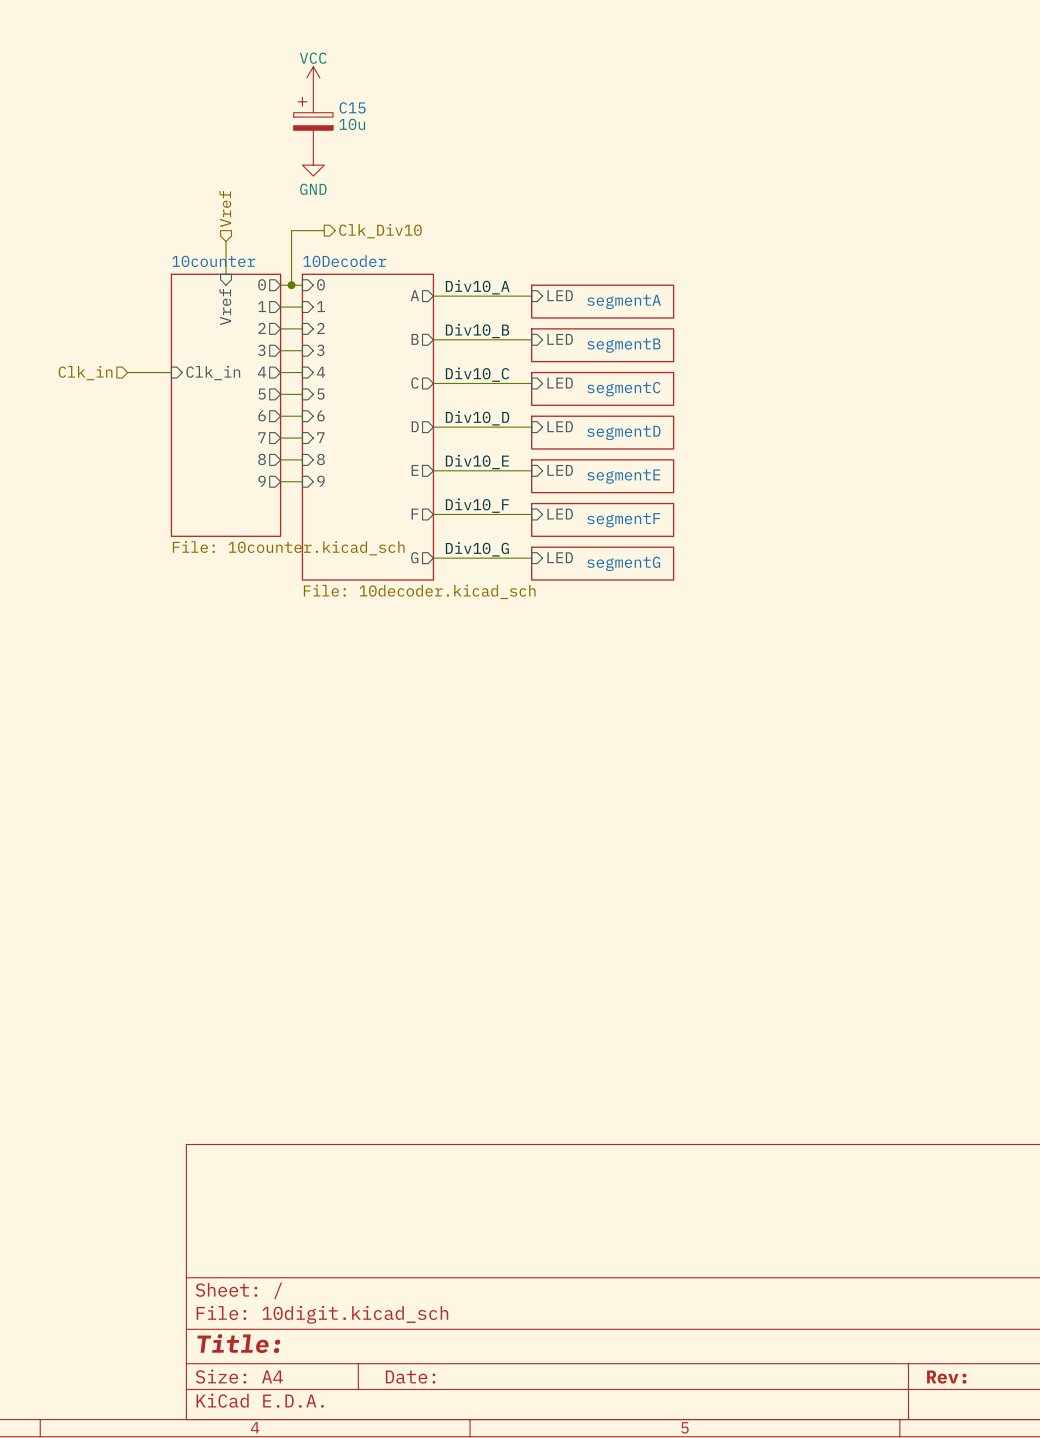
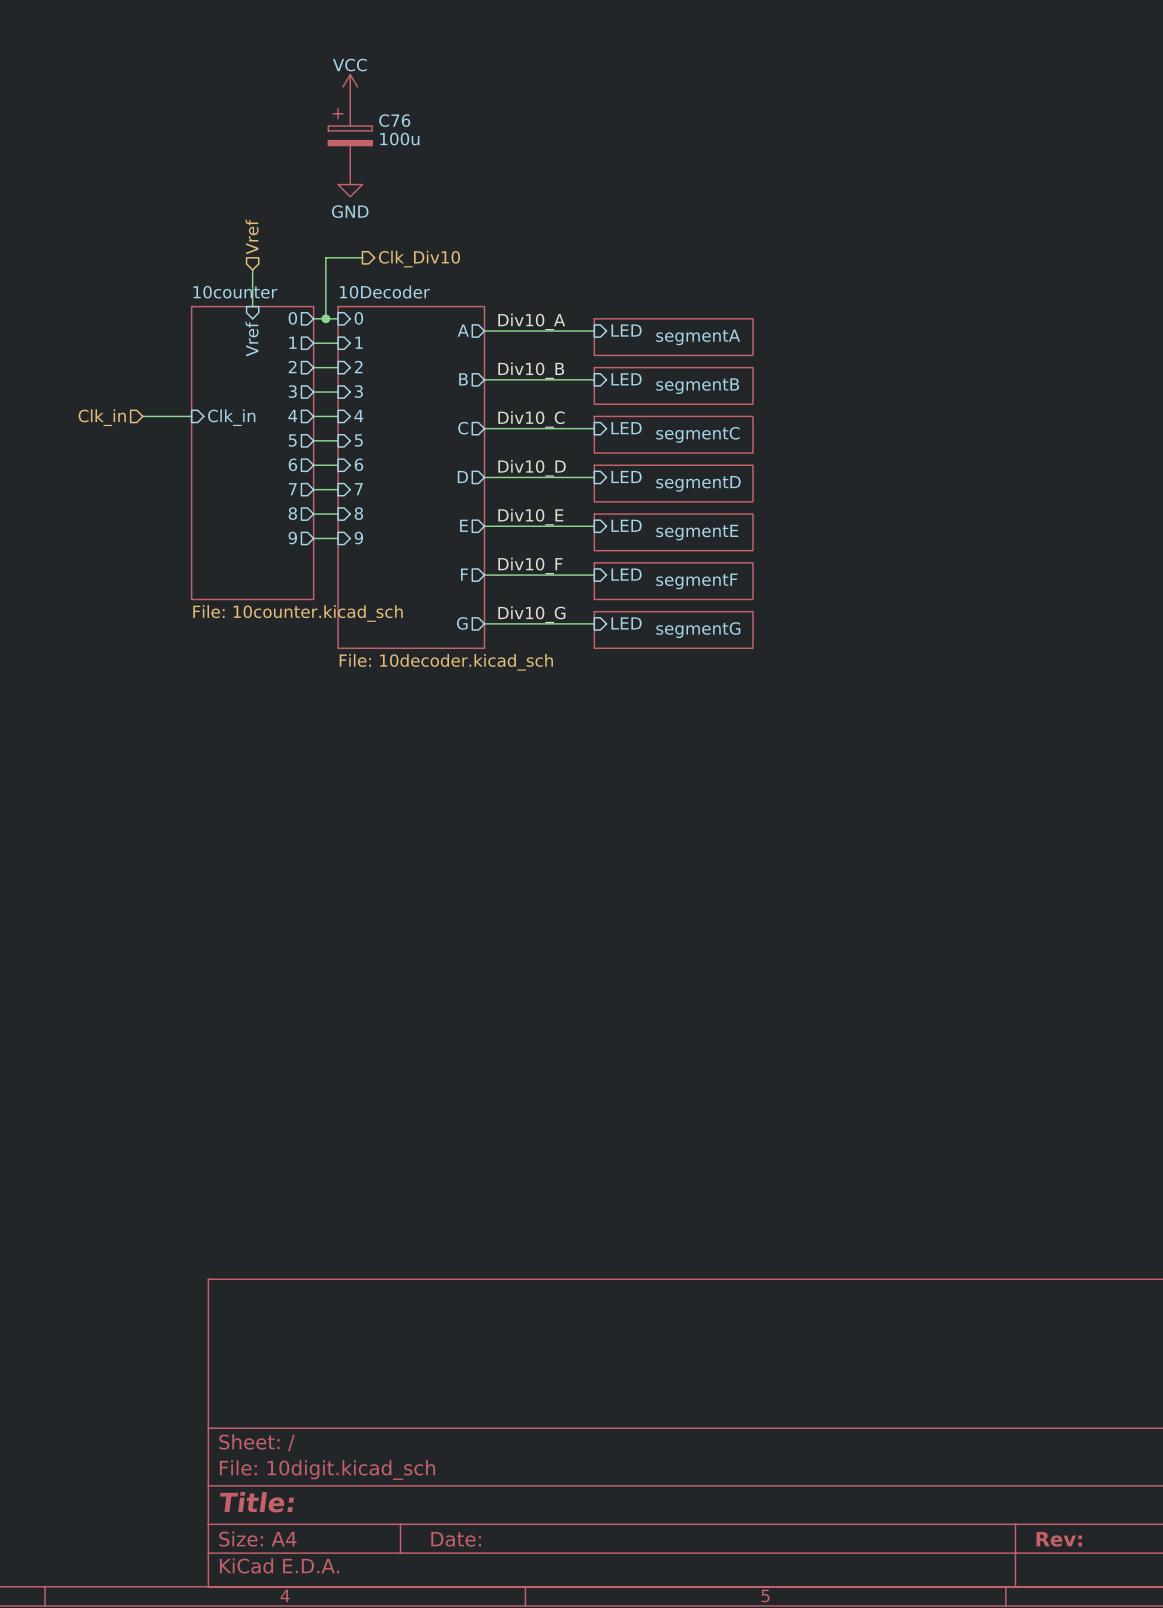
C15 name: C15 (352, 107) -> C76 (394, 120)
C15 value: 10u (352, 124) -> 100u (399, 139)

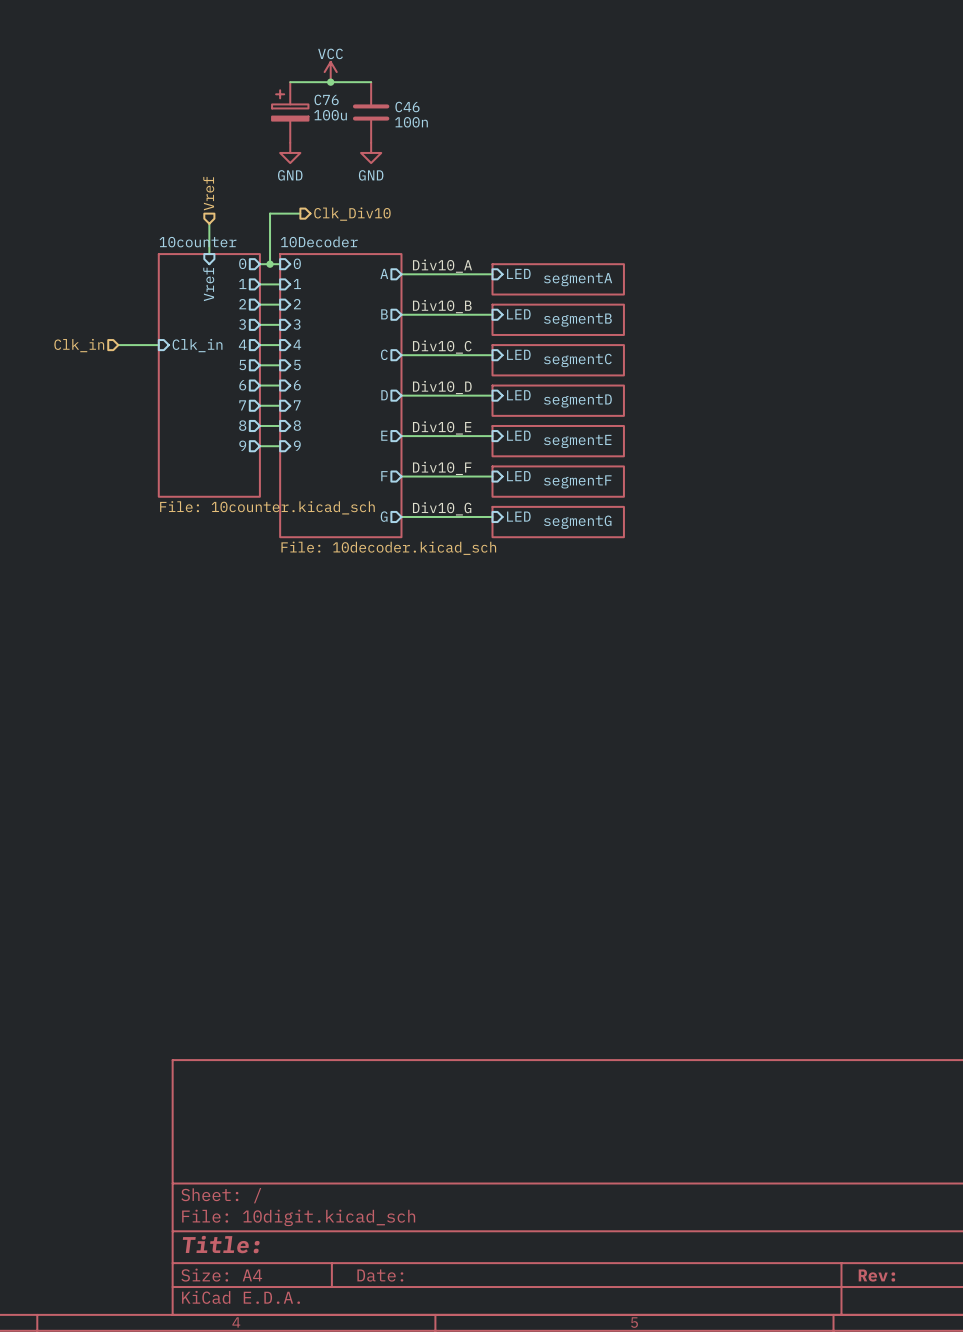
power symbol position: VCC (350, 86) -> VCC (330, 72)
wire: none -> (290, 82) (371, 82)
junction: none -> (330, 82)
C46: none -> 100n (371, 112)
power symbol: none -> GND (371, 152)

